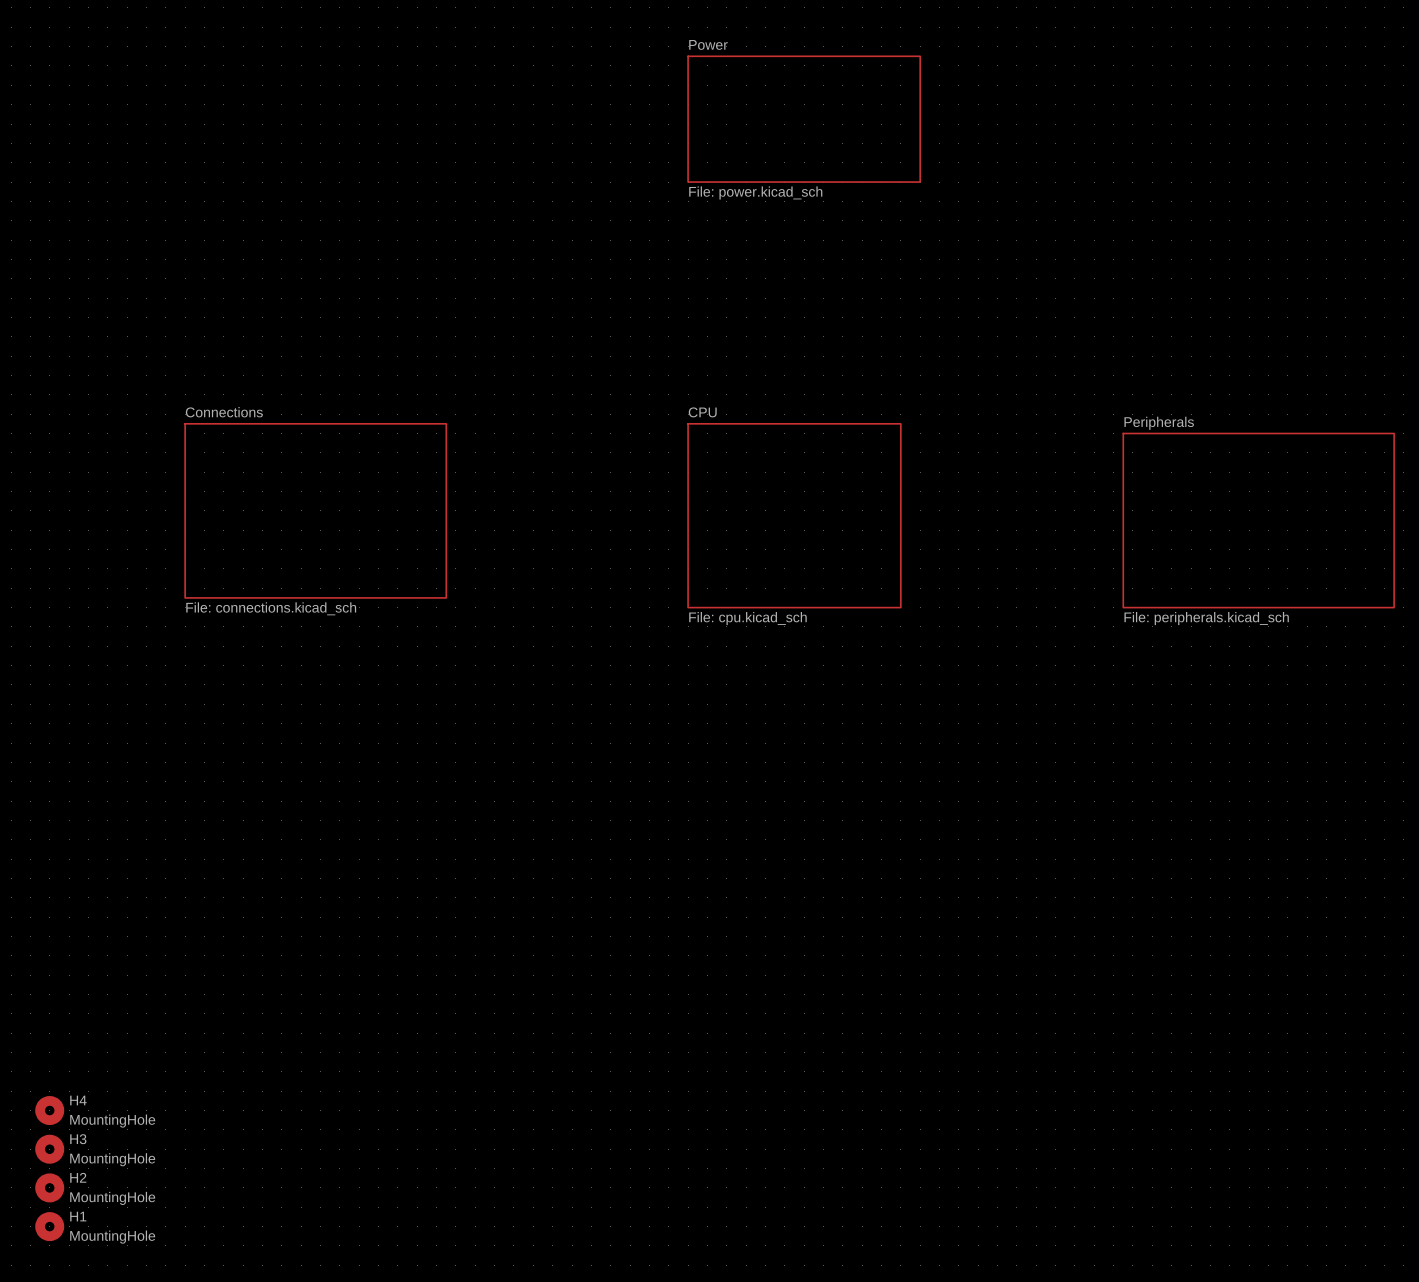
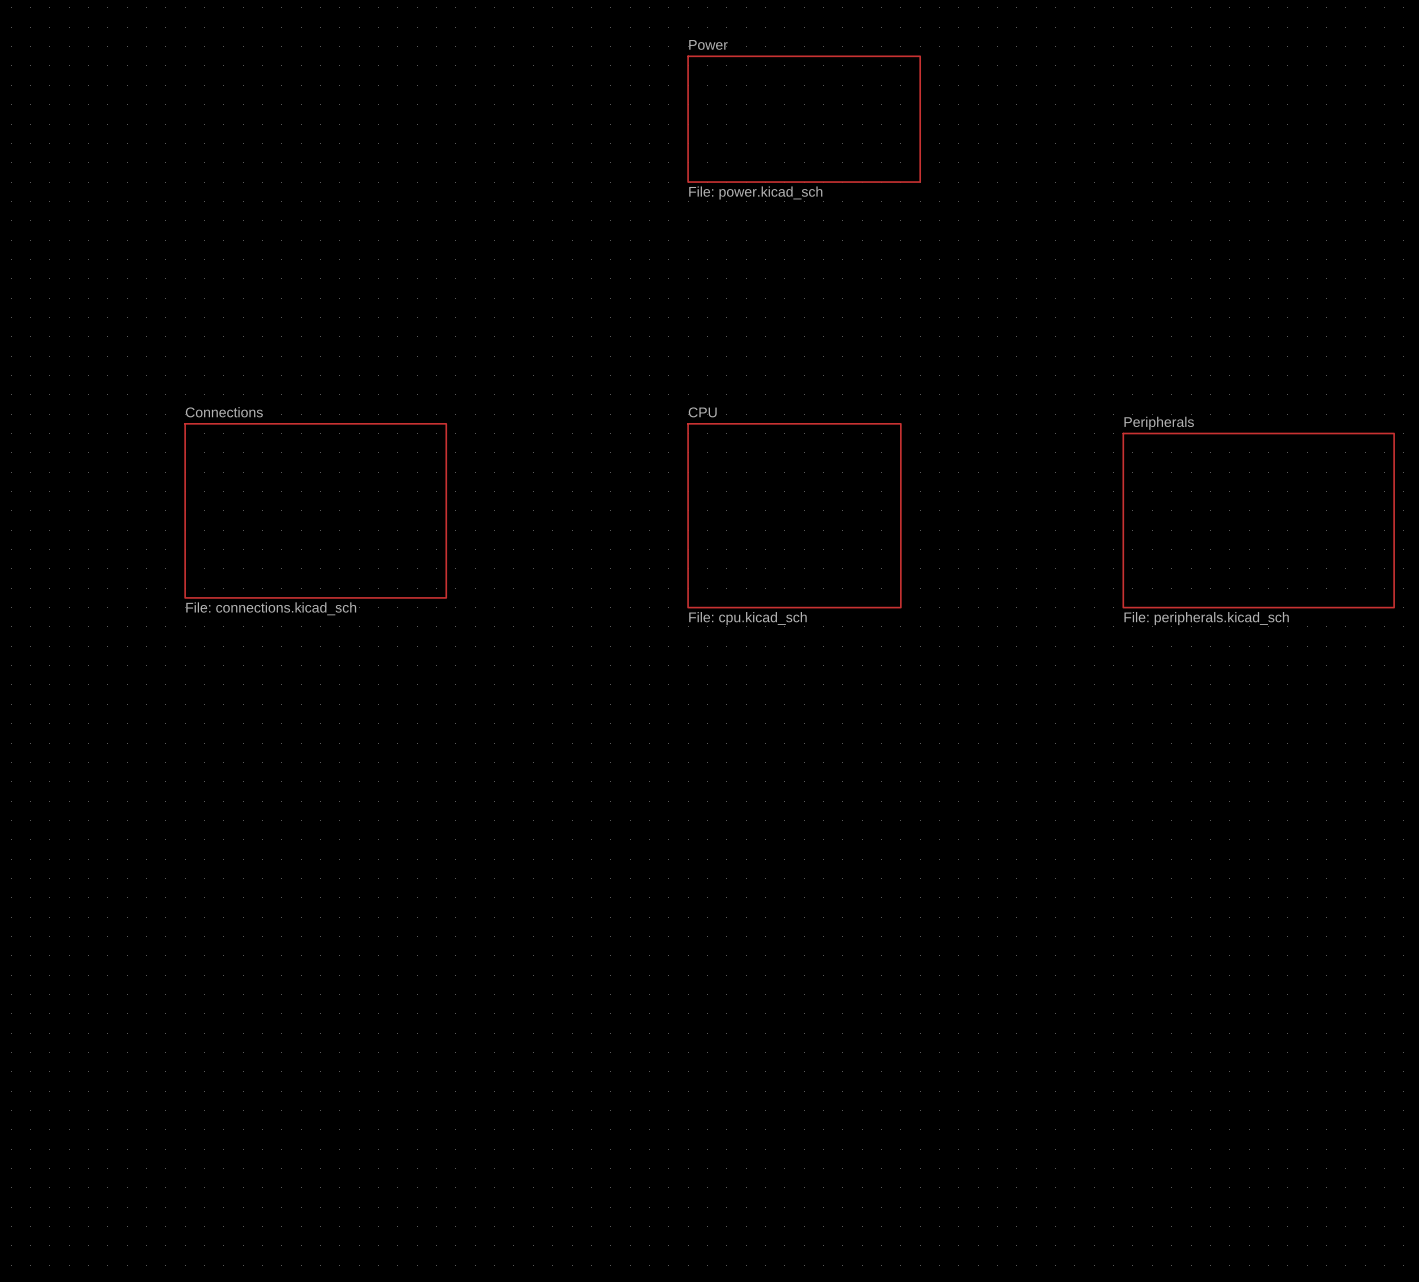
H4: MountingHole (49, 1110) -> none
H3: MountingHole (49, 1149) -> none
H2: MountingHole (49, 1187) -> none
H1: MountingHole (49, 1226) -> none

